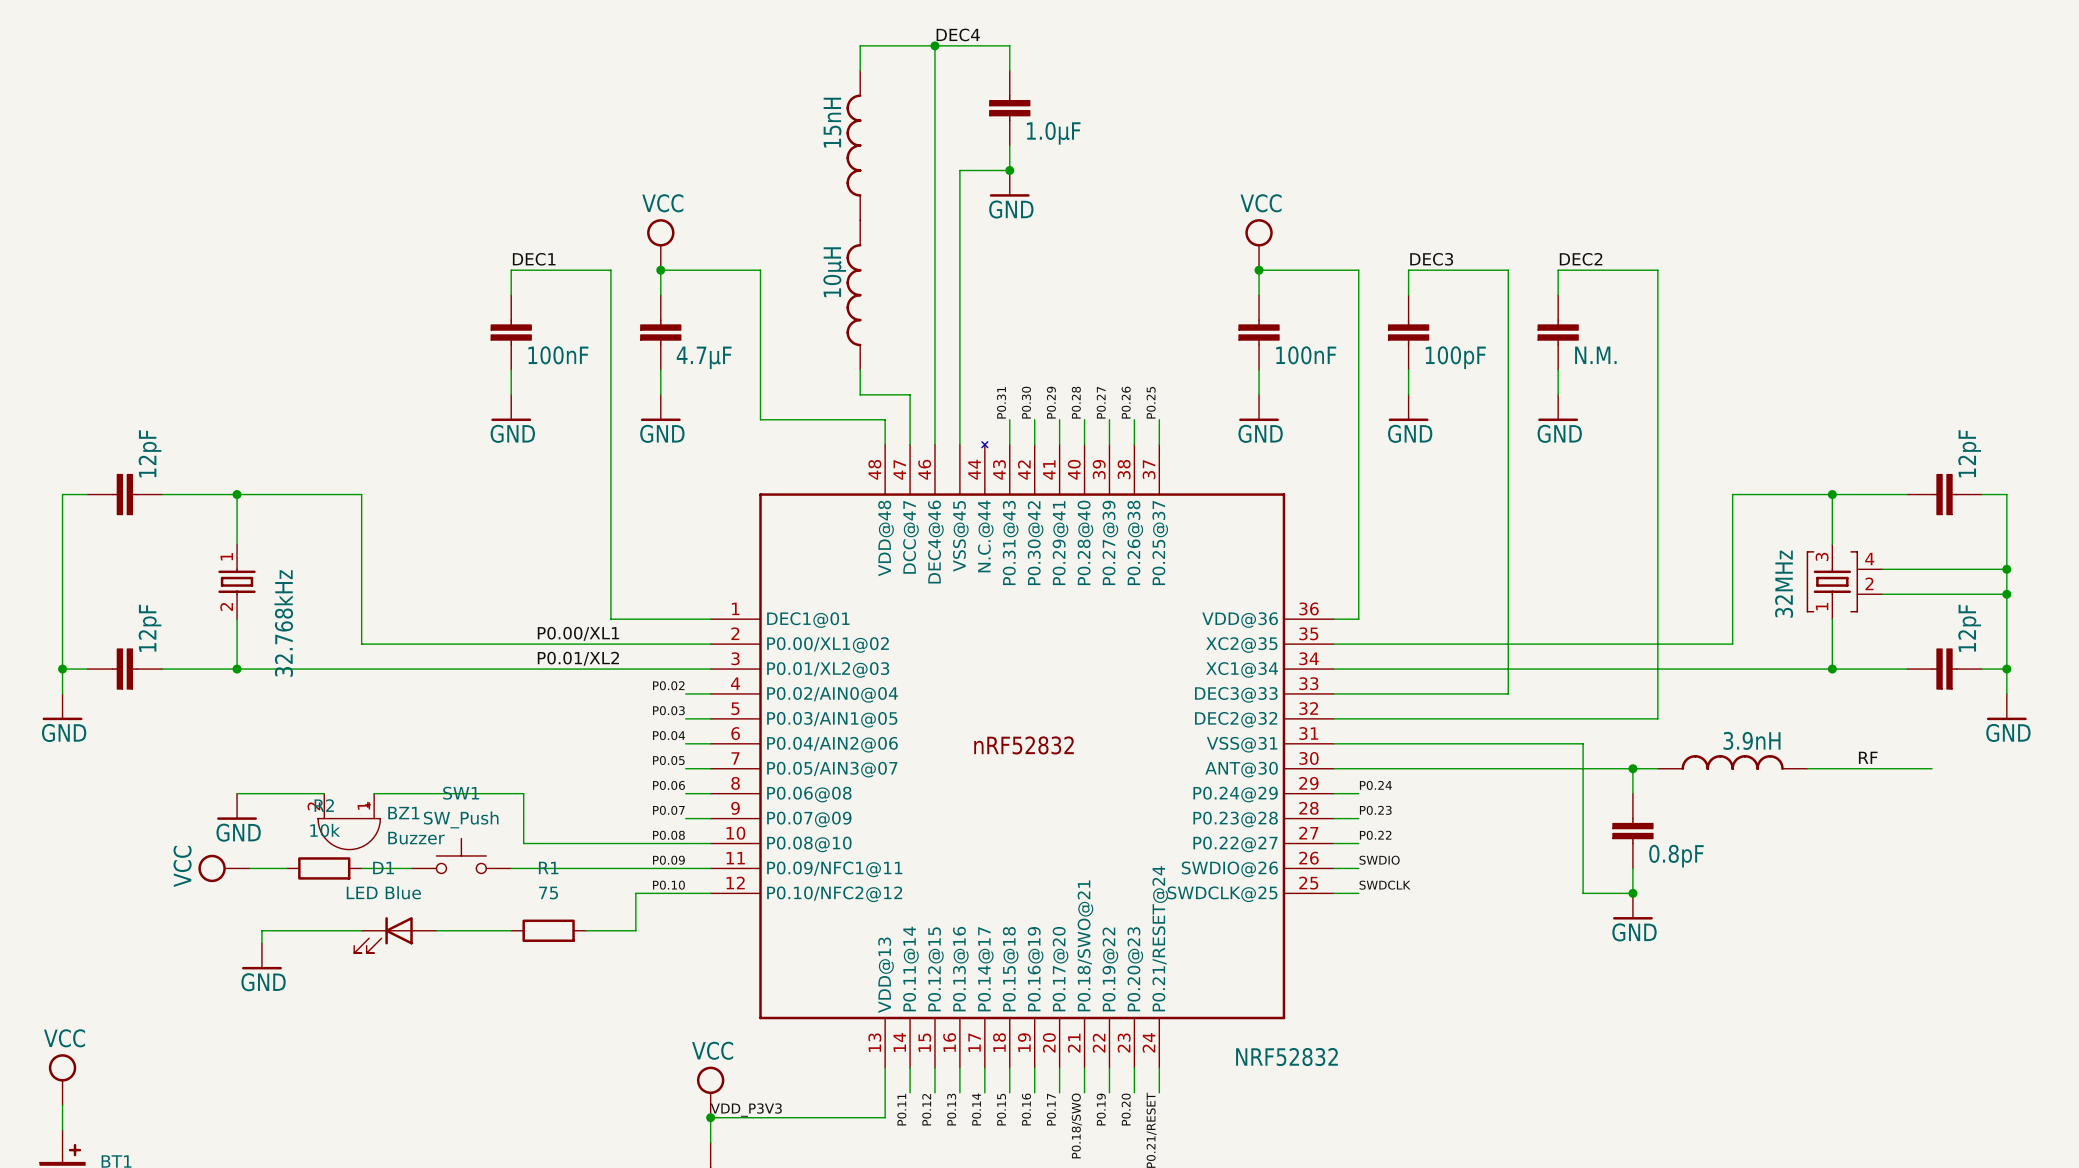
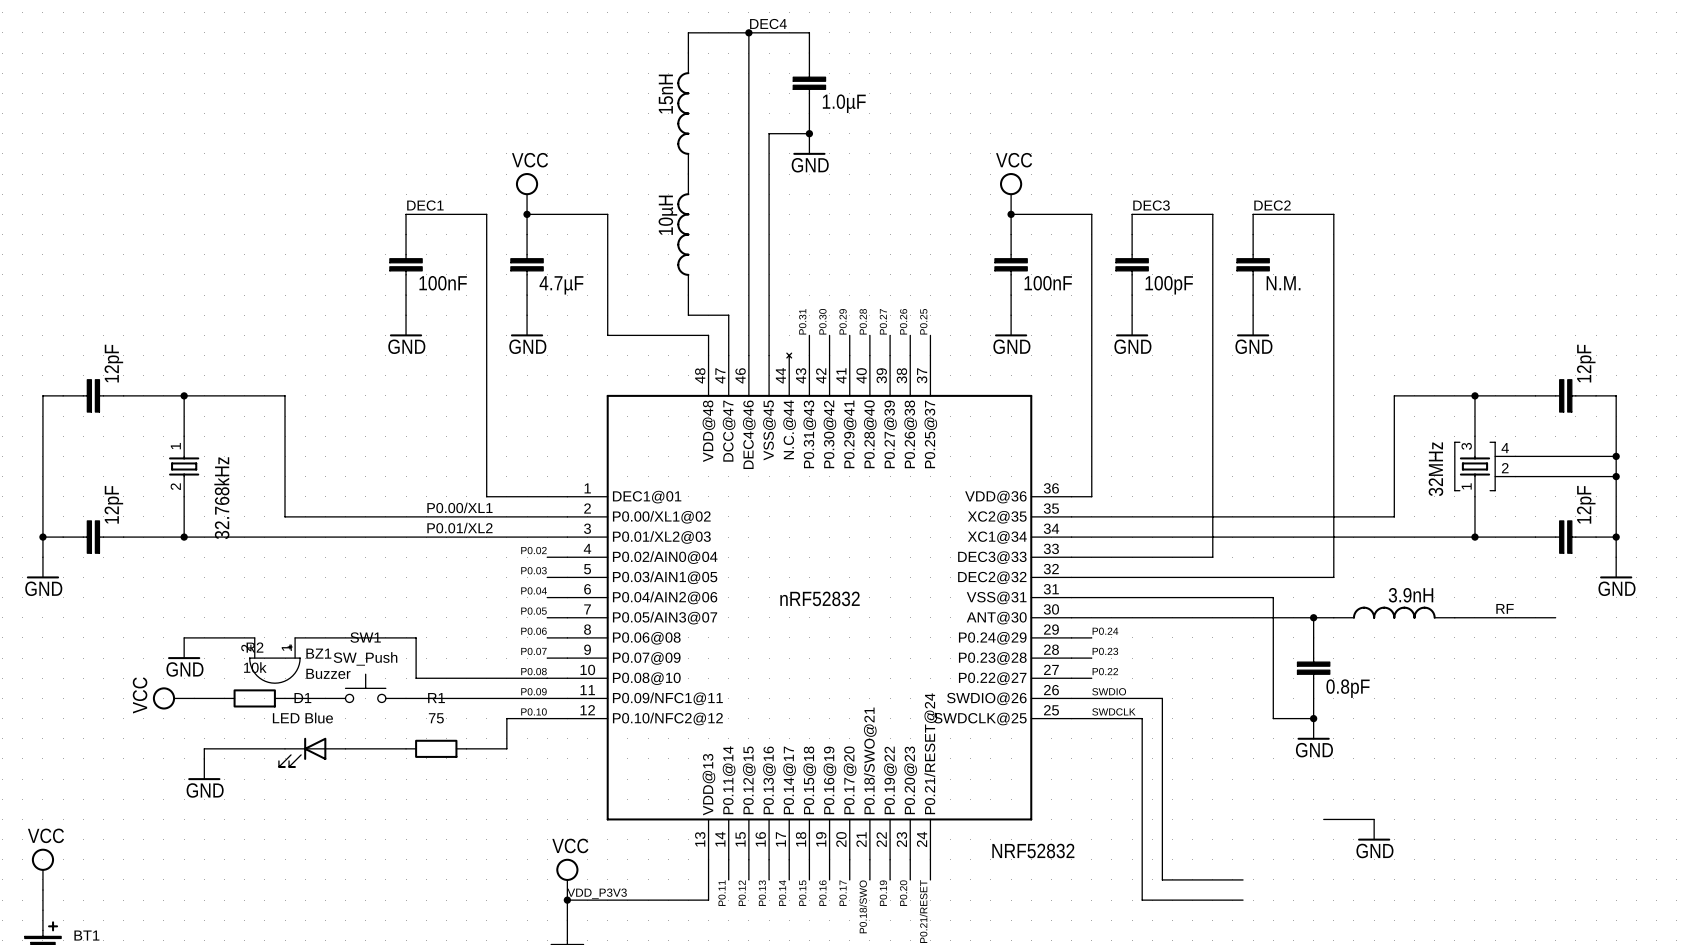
wire: none -> (1091, 698) (1162, 698) (1162, 879) (1243, 879)
wire: none -> (1091, 718) (1142, 718) (1142, 900) (1243, 900)
wire: none -> (1323, 819) (1374, 819)
power symbol: none -> GND (1374, 830)

